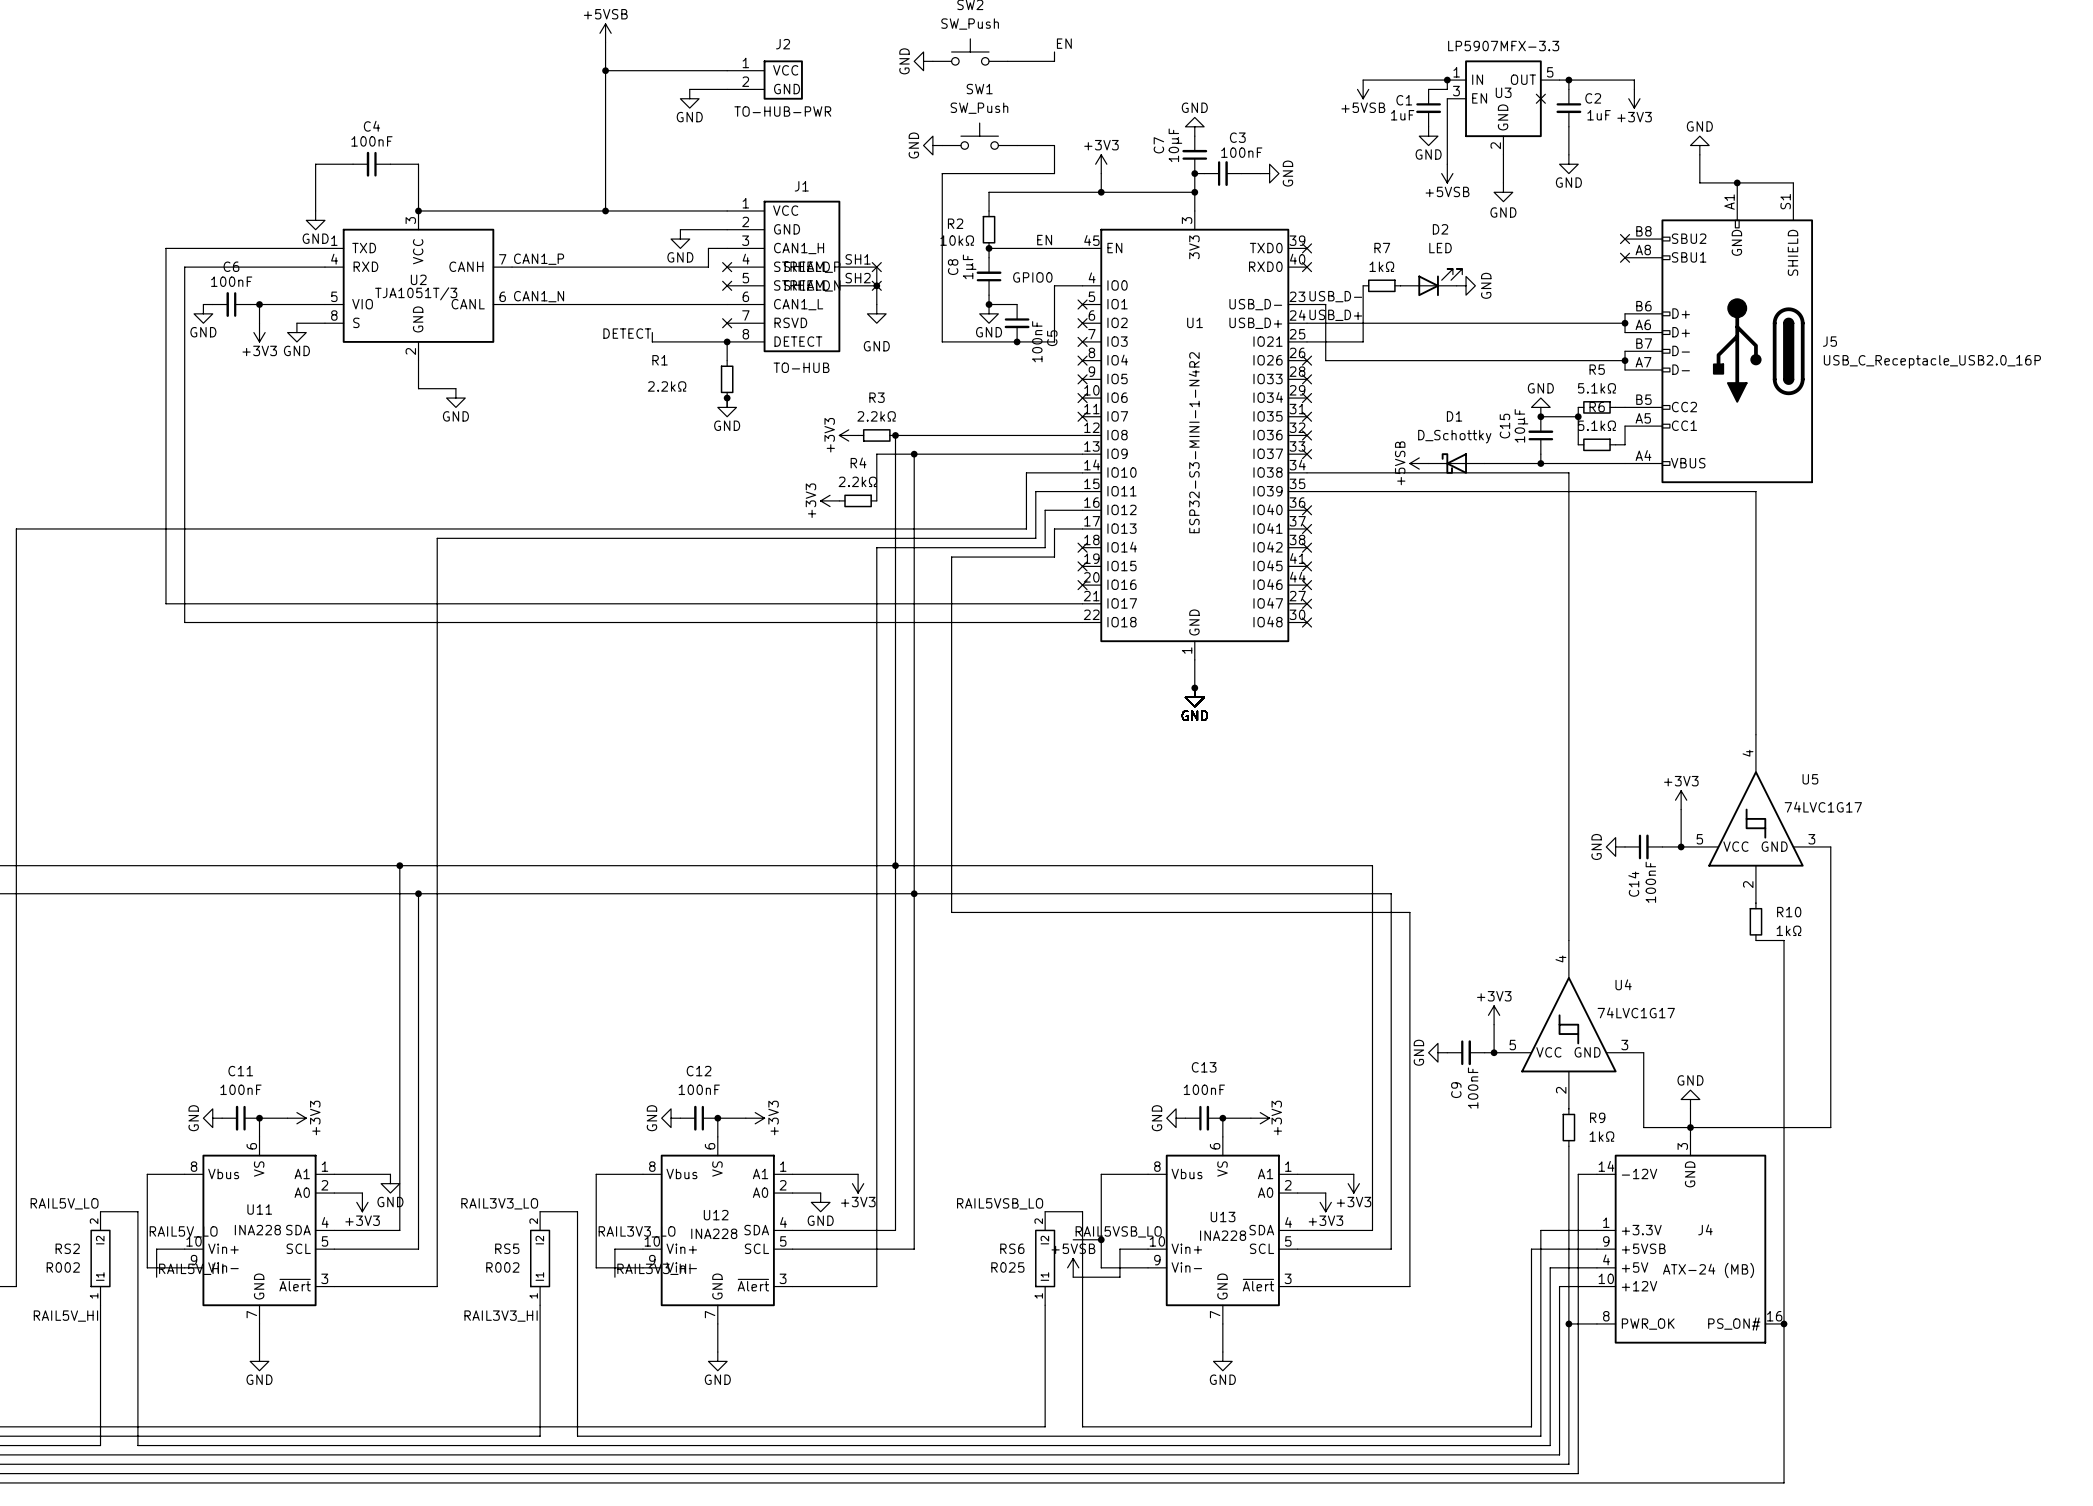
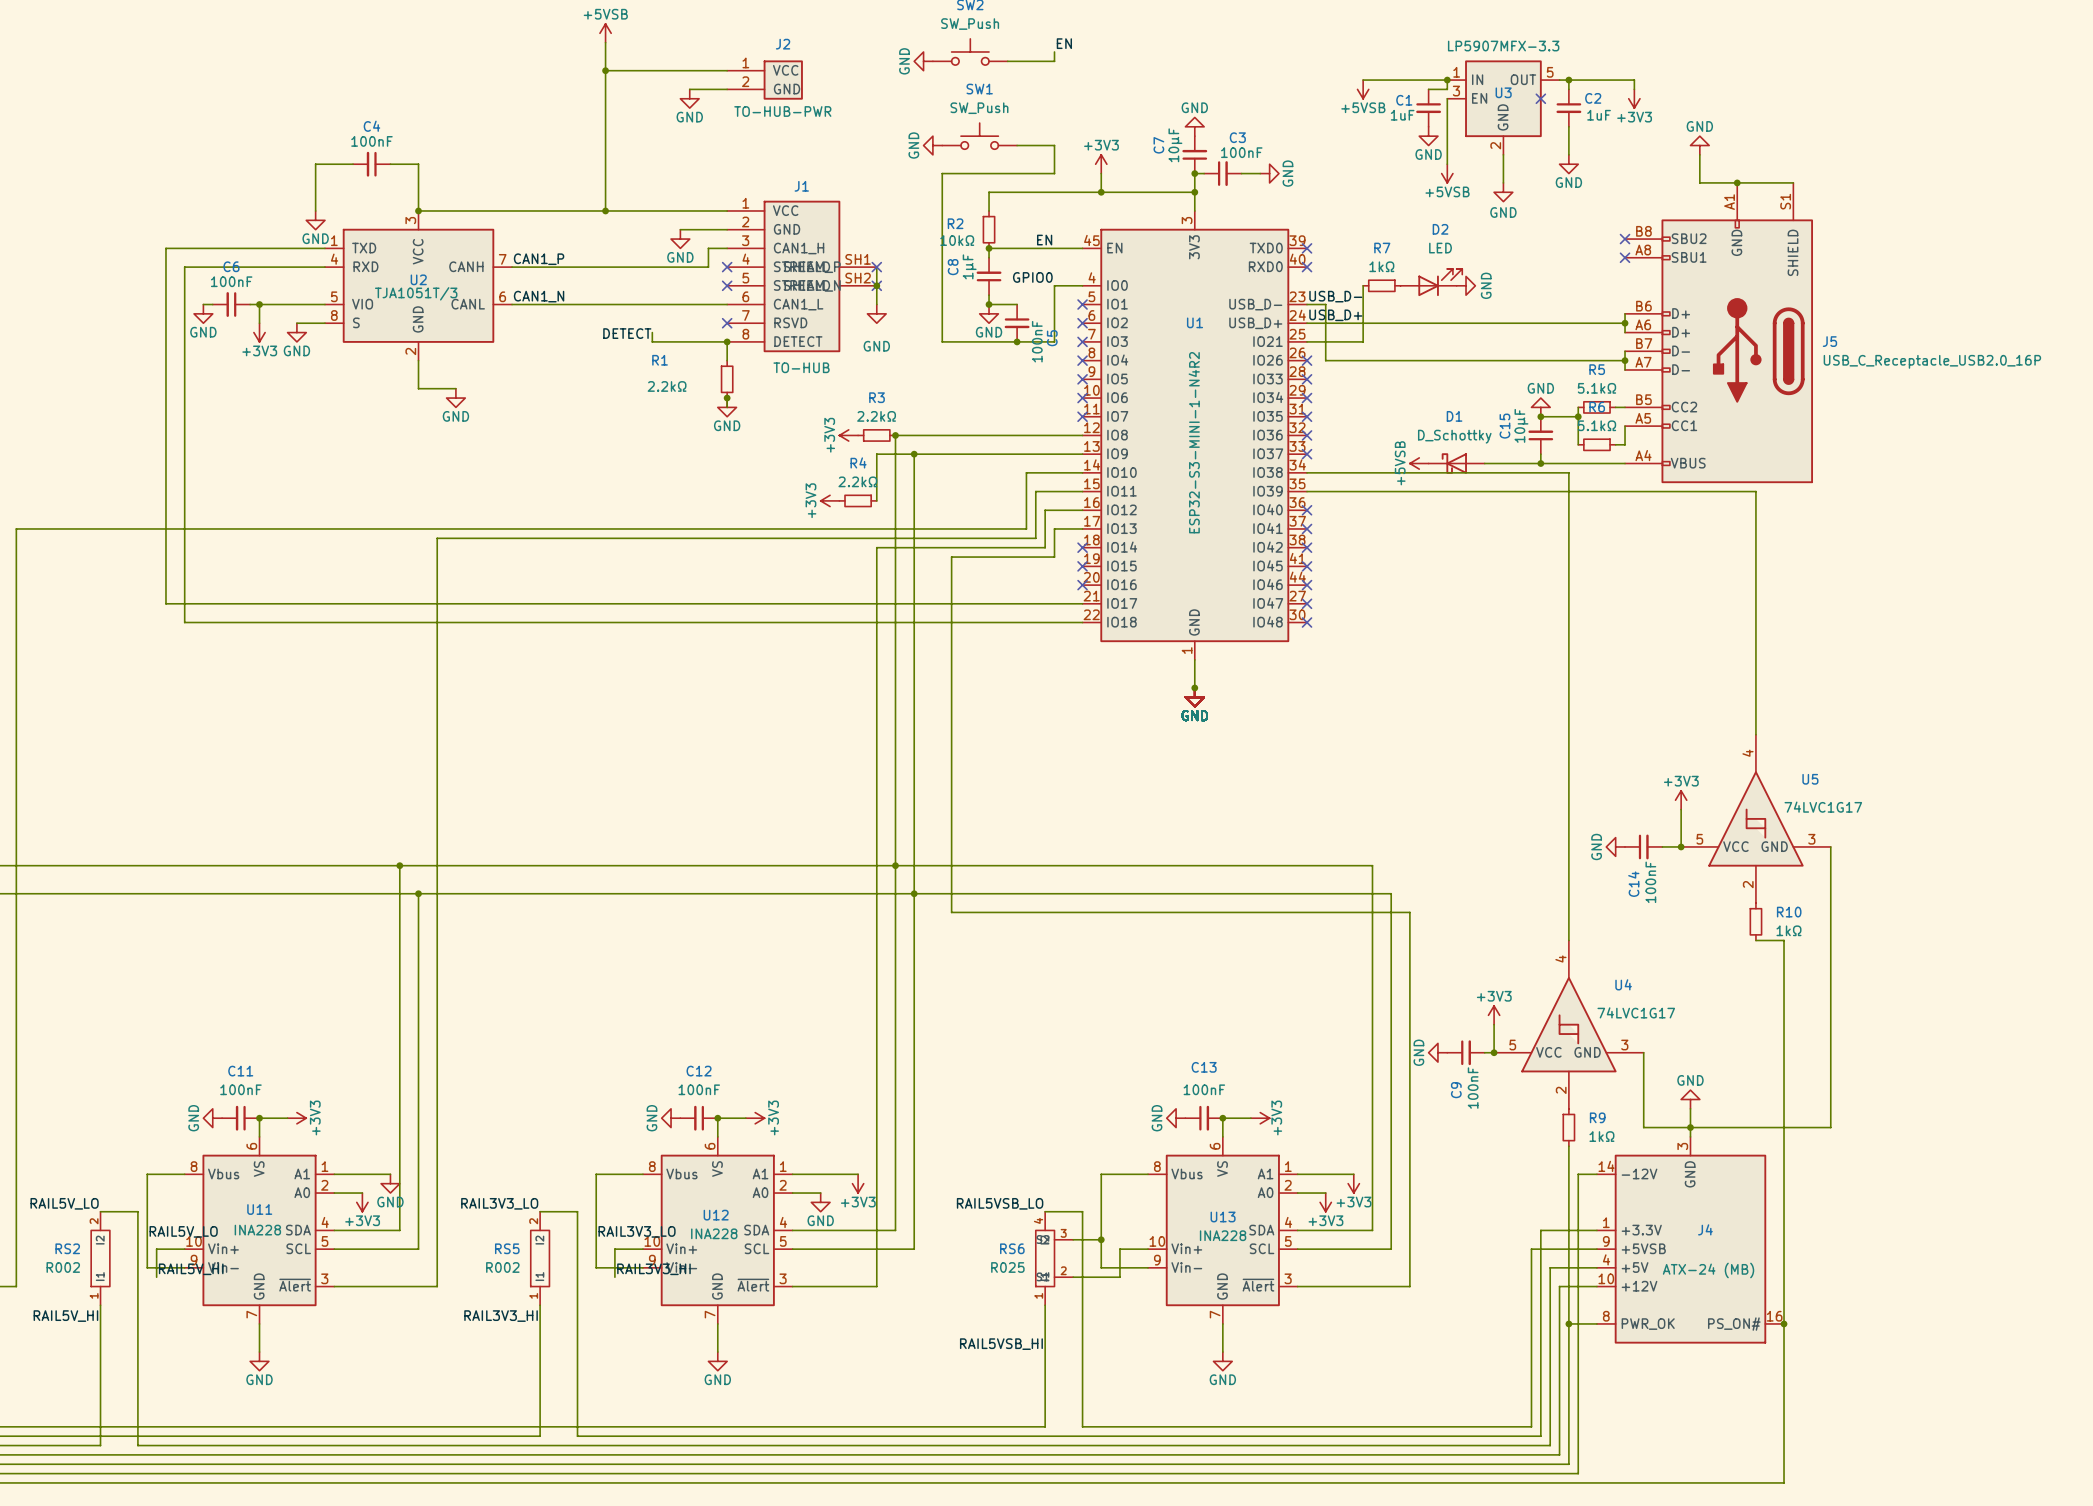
RS6 symbol: [1035, 1211, 1056, 1306] -> [1035, 1211, 1074, 1306]
label: RAIL5VSB_LO (1118, 1231) -> none
power symbol: +5VSB (1073, 1267) -> none
label: none -> RAIL5VSB_HI (1001, 1344)

